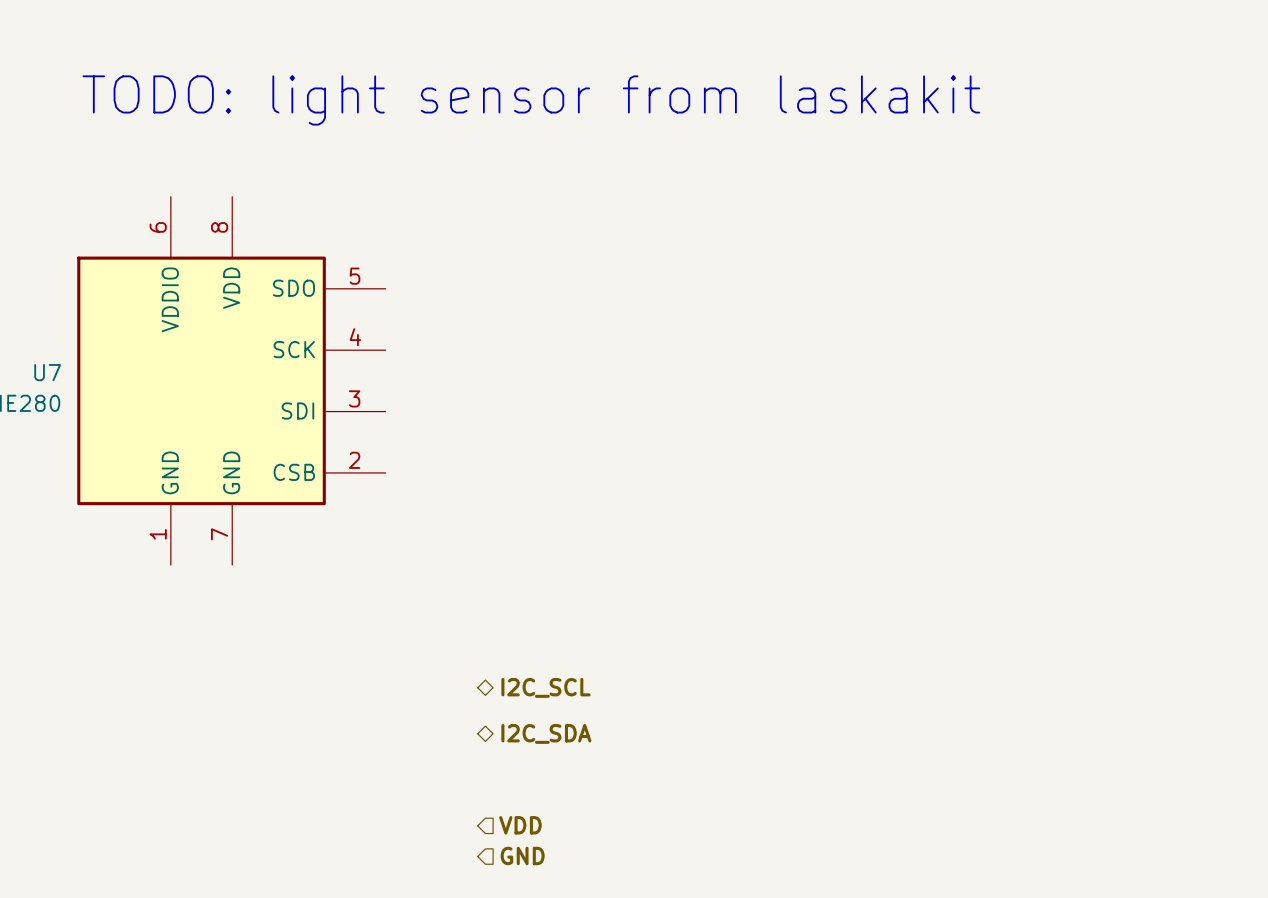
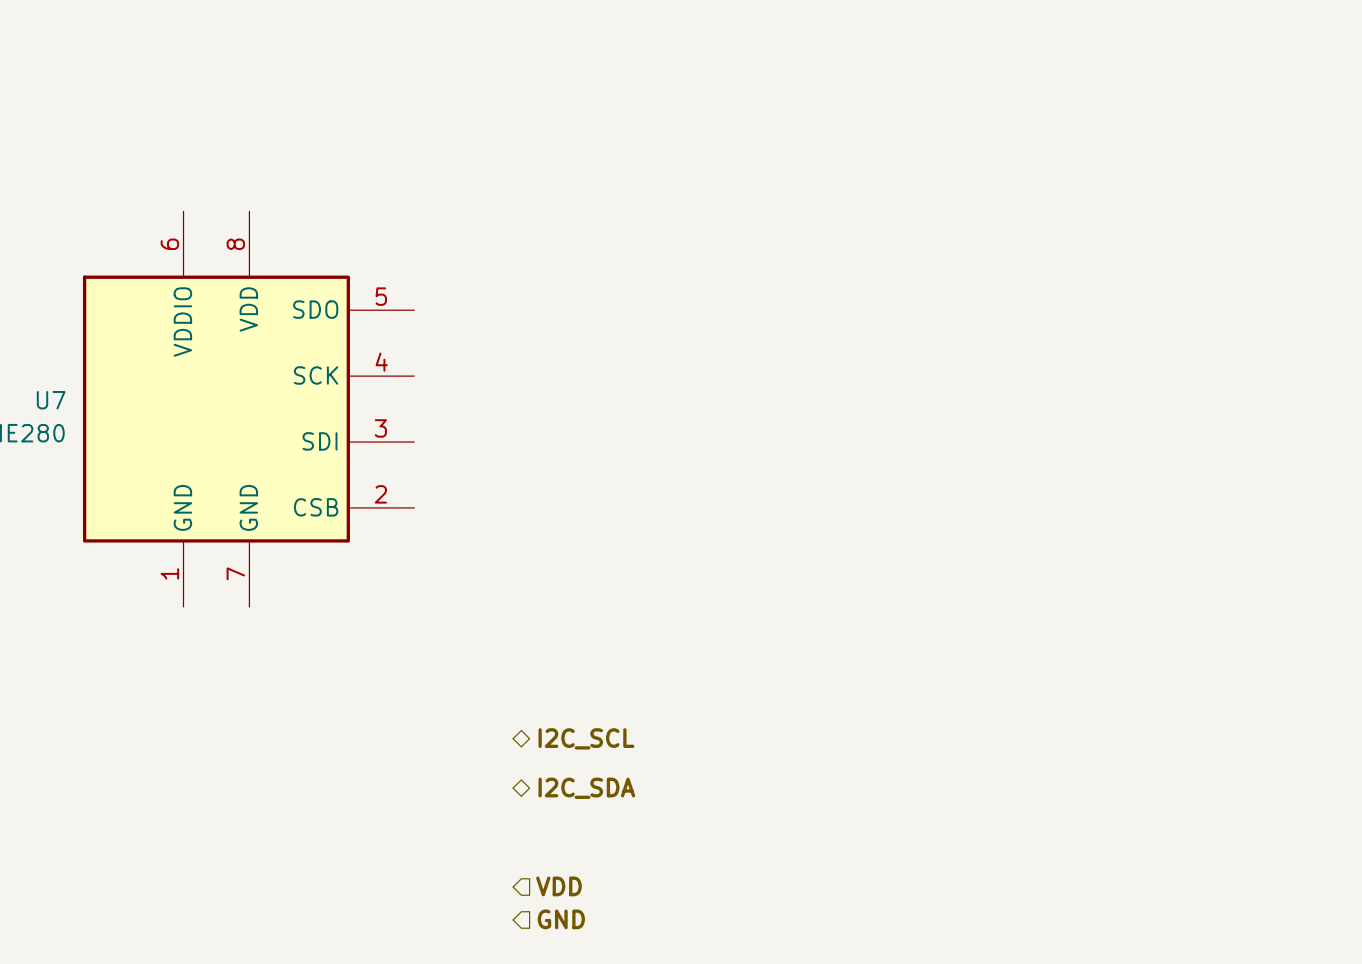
text: TODO: light sensor from laskakit (531, 100) -> none

